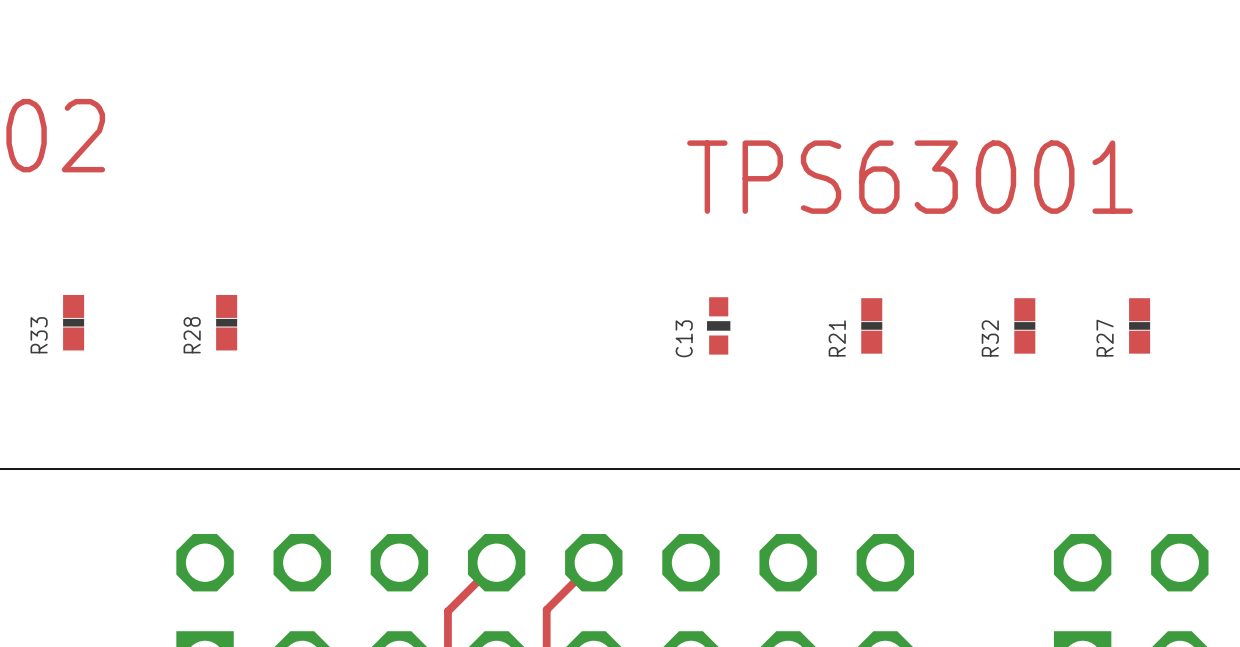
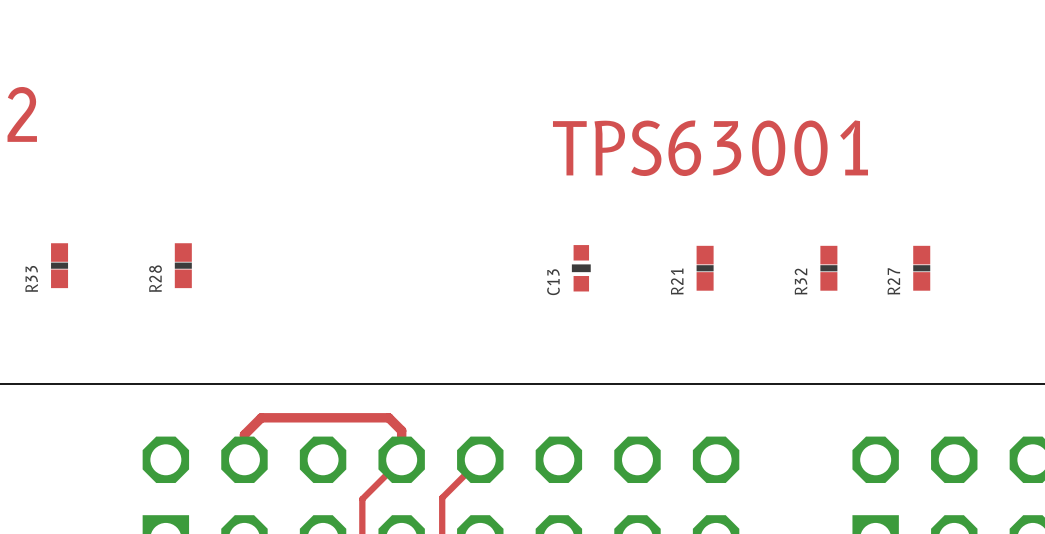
track: none -> (244, 459) (244, 434) (261, 417) (388, 417) (401, 430) (401, 459)

